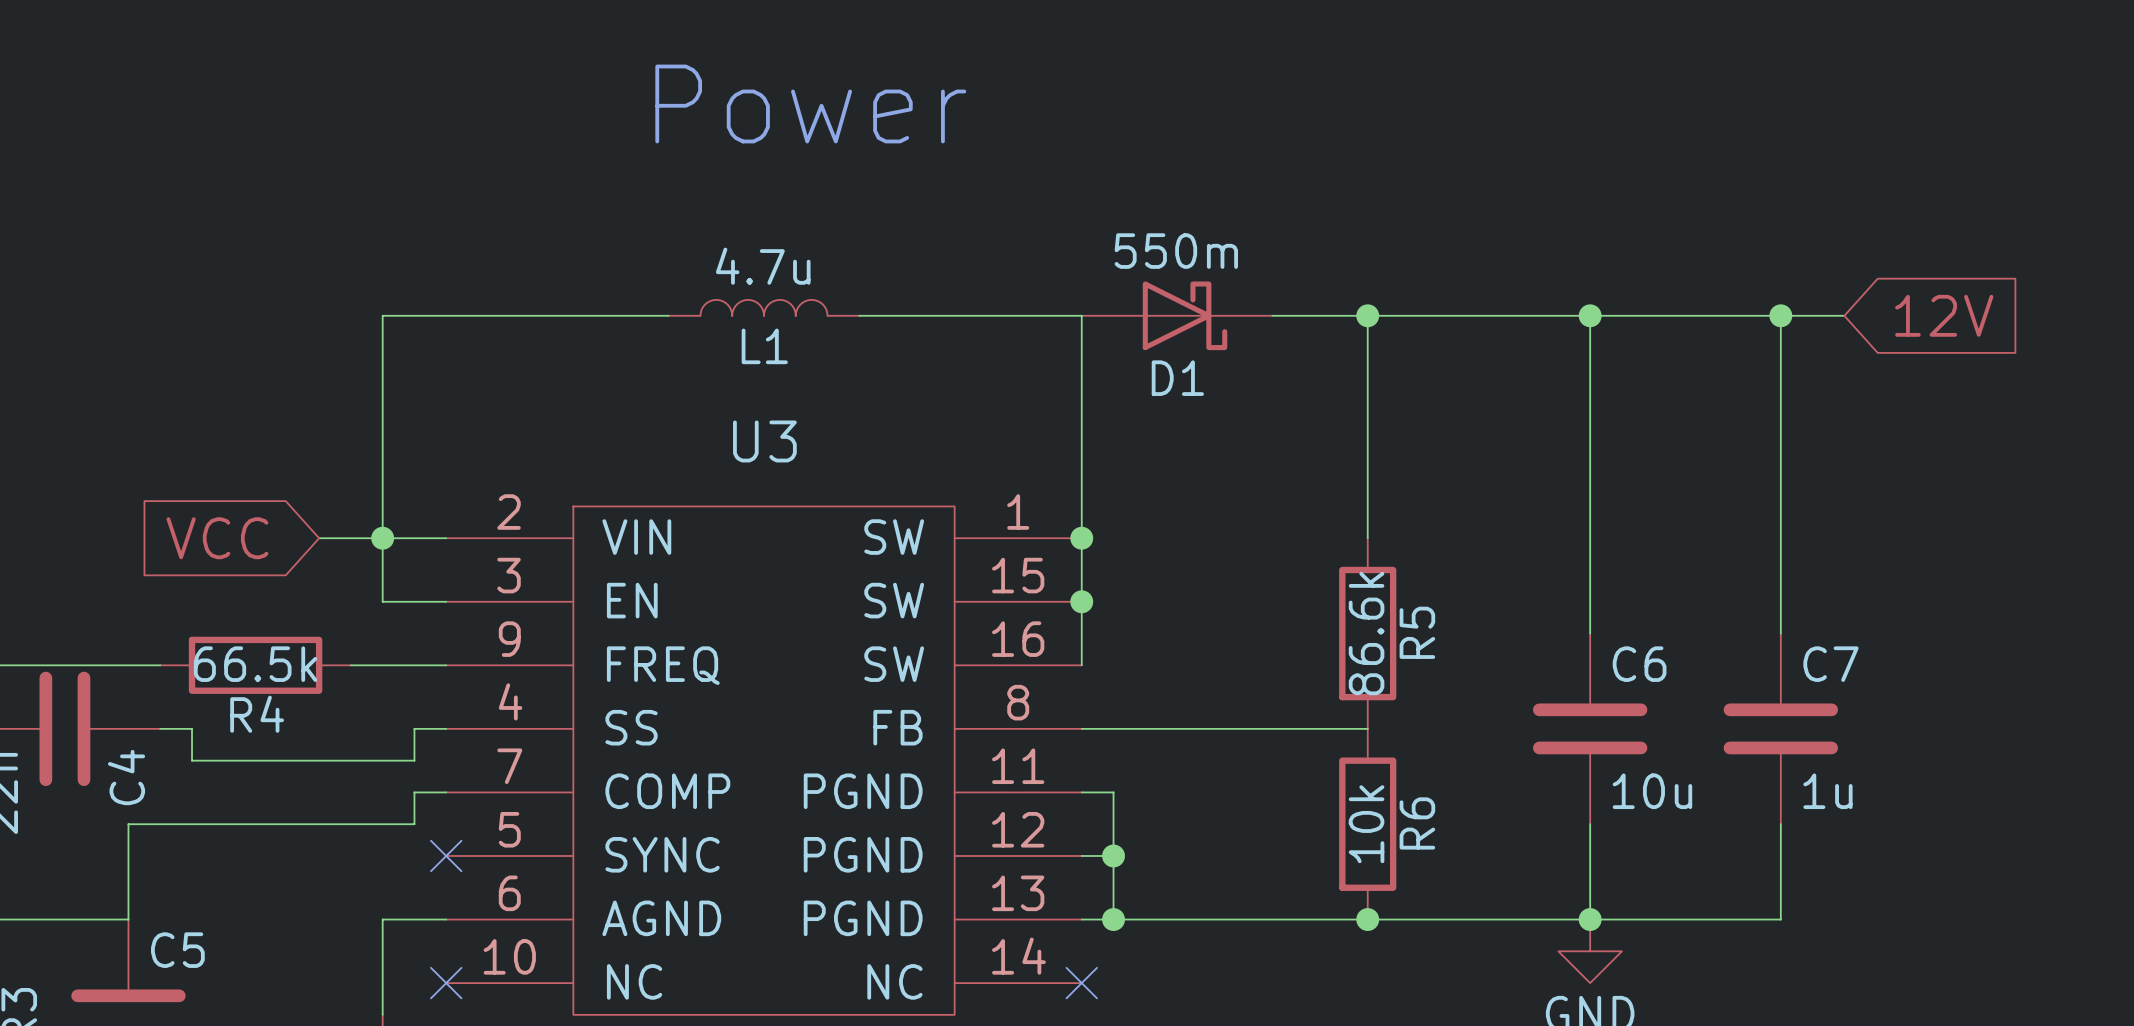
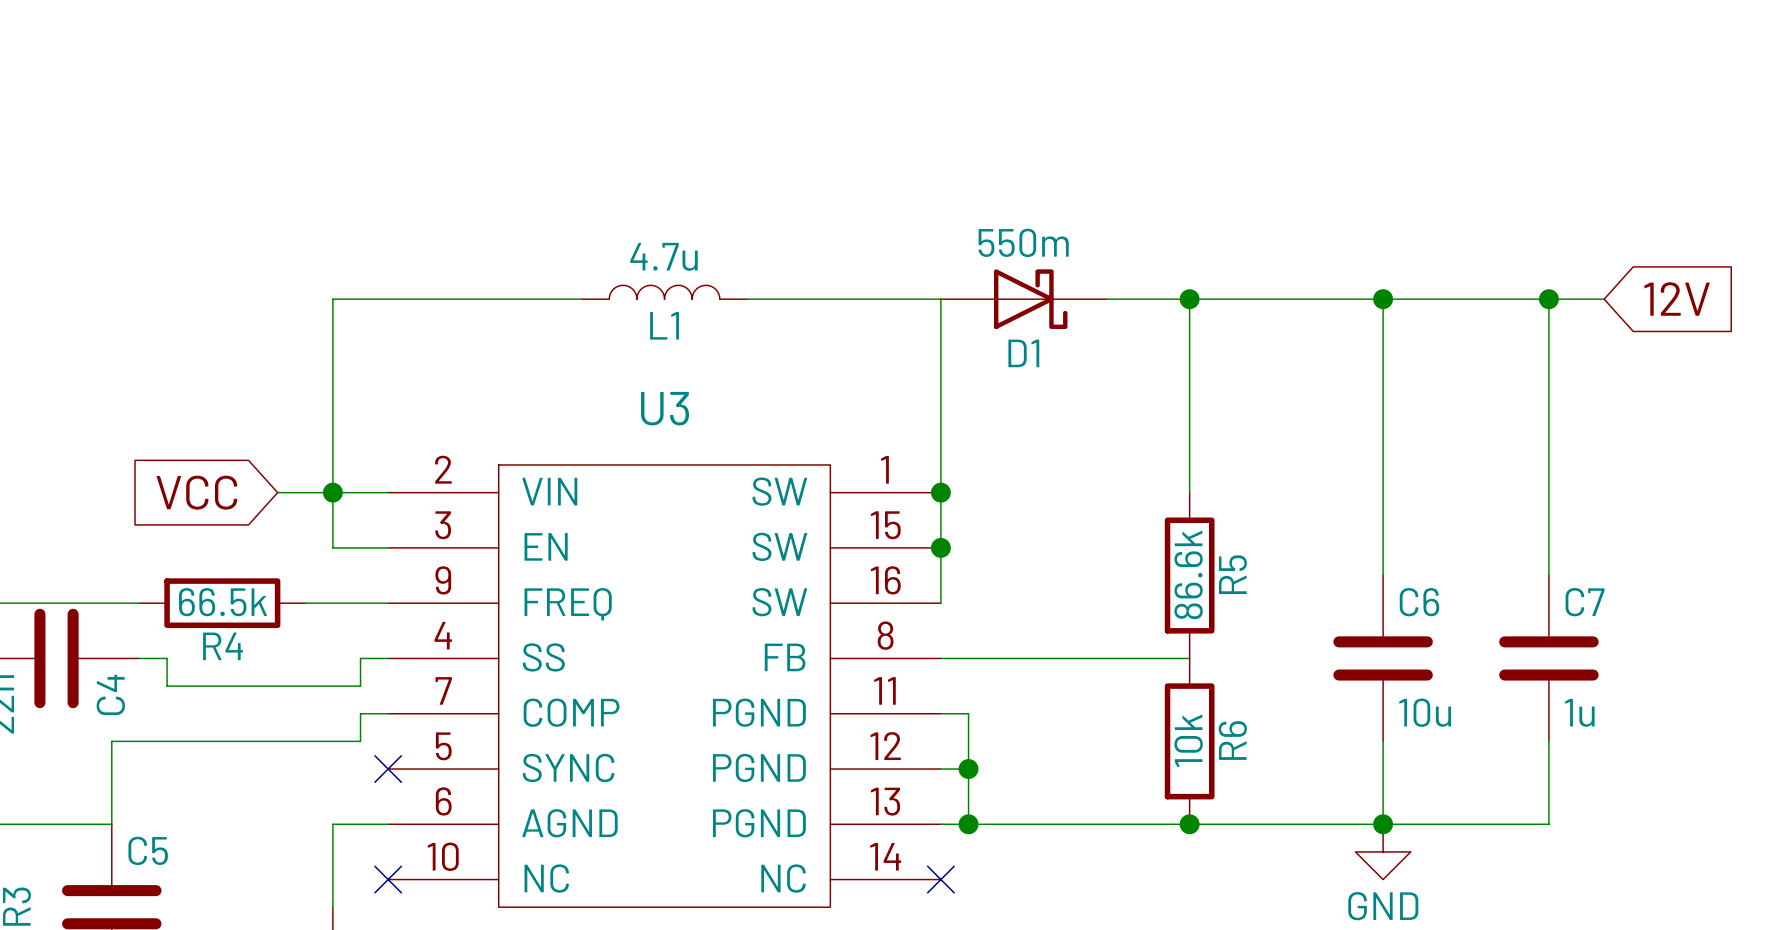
text: Power (810, 103) -> none

